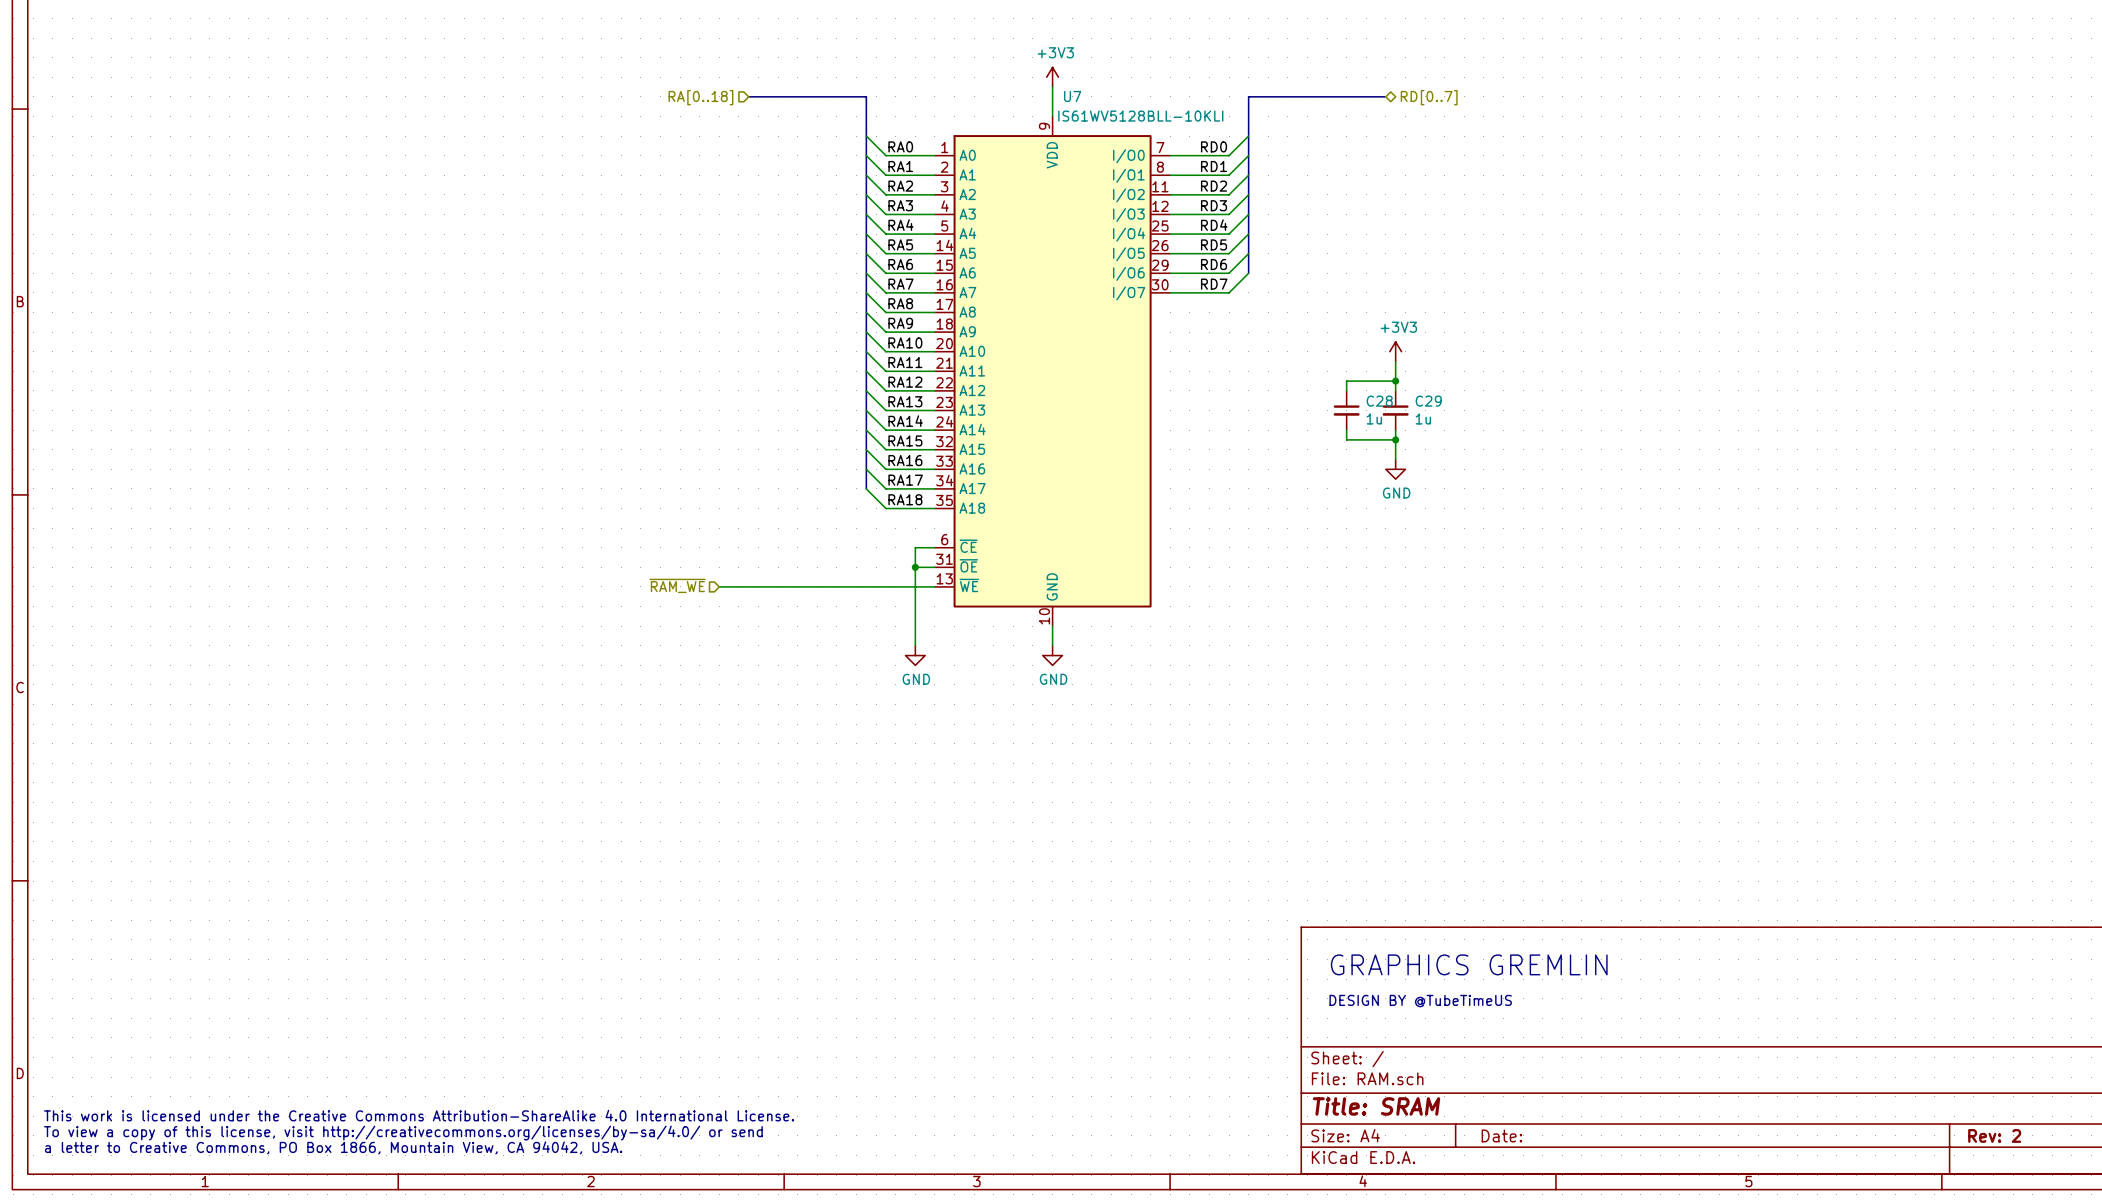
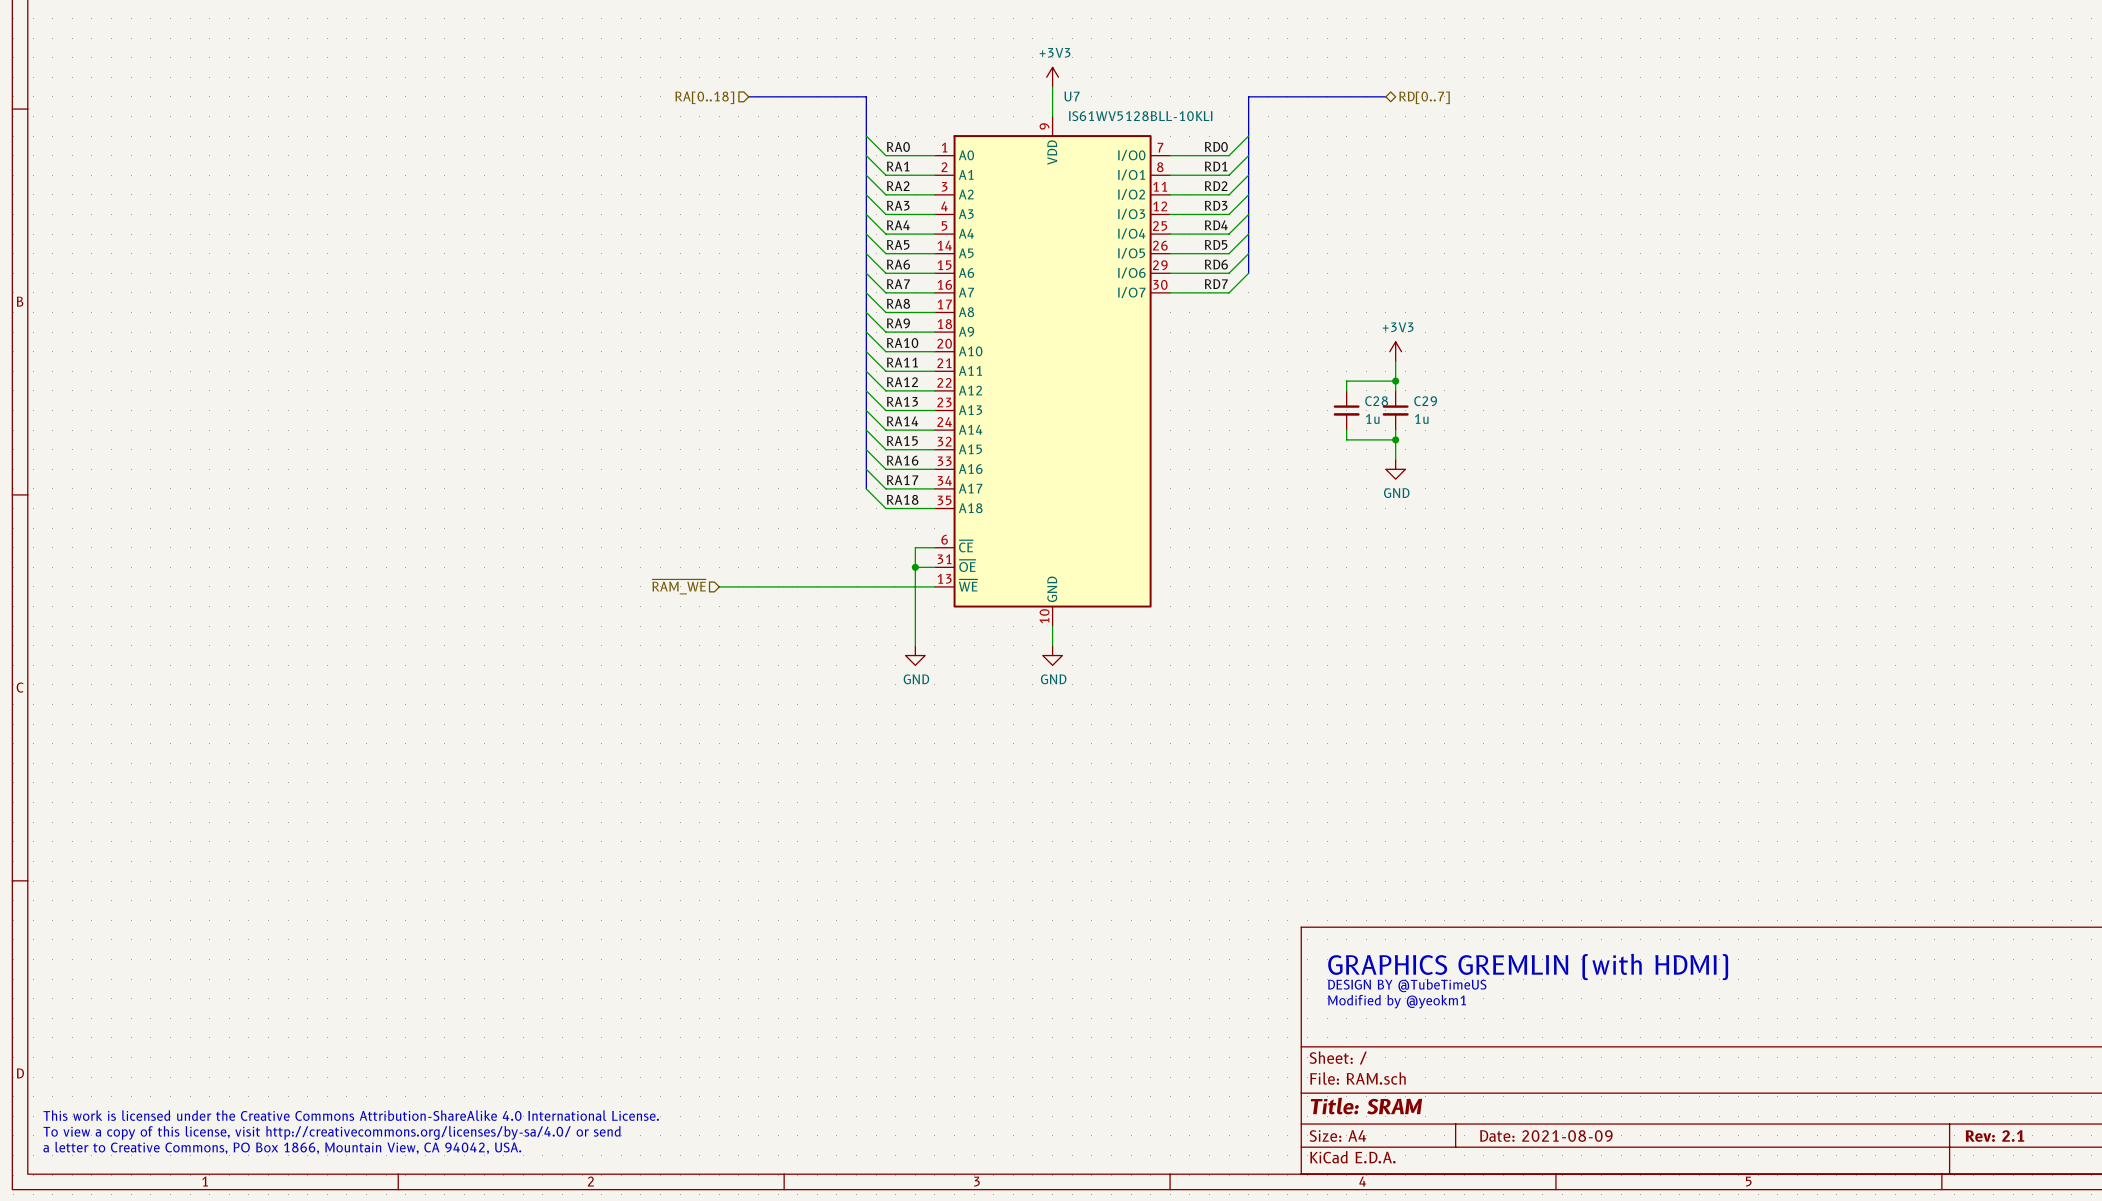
text: GRAPHICS GREMLIN (1469, 964) -> GRAPHICS GREMLIN (with HDMI) (1528, 966)
text: none -> DESIGN BY @TubeTimeUS (1407, 985)
text: DESIGN BY @TubeTimeUS (1420, 1001) -> Modified by @yeokm1 (1397, 1001)
title block: Date: (1501, 1135) -> Date: 2021-08-09 (1546, 1136)
title block: Rev: 2 (1994, 1135) -> Rev: 2.1 (1994, 1136)

